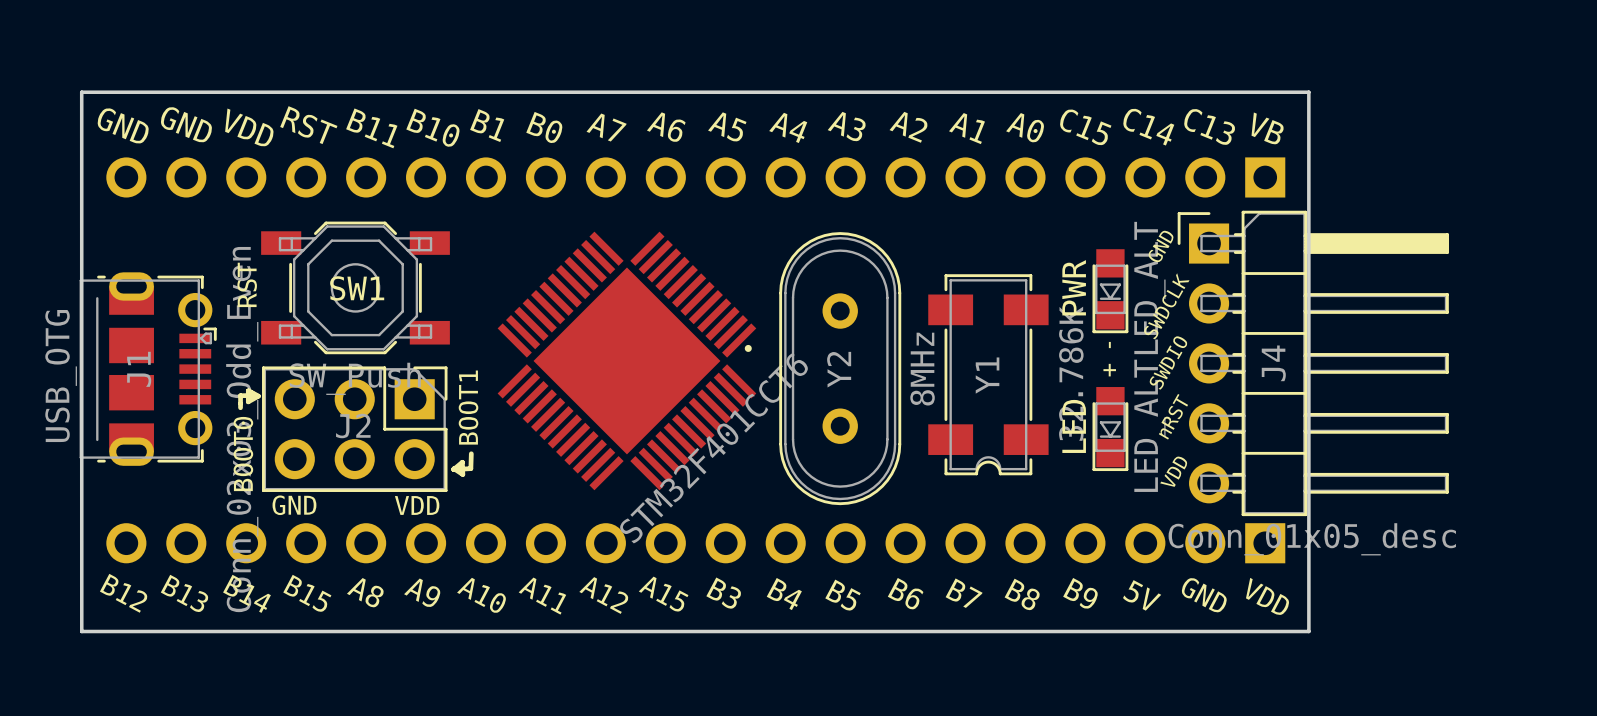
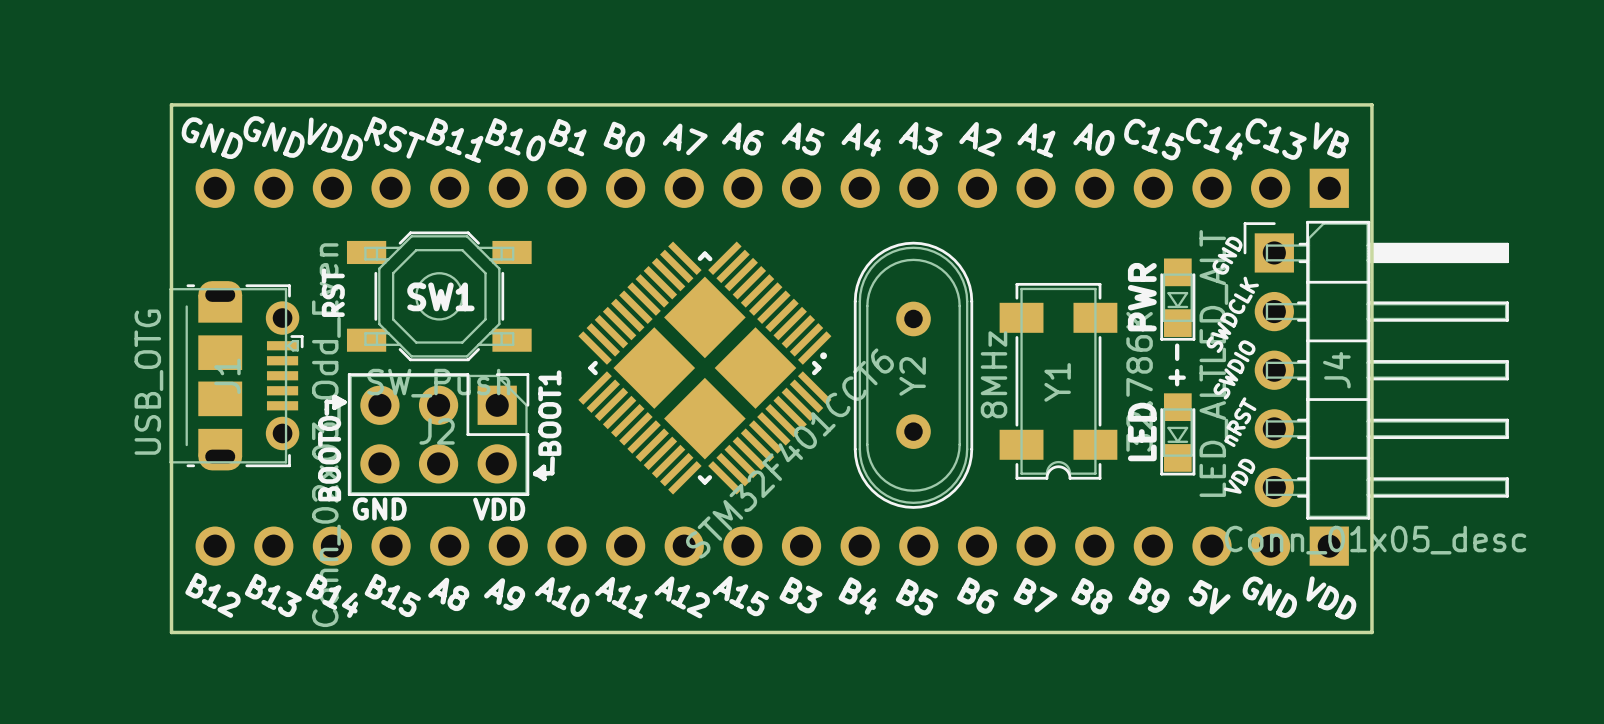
part footprint: [497, 231, 757, 491] -> [578, 241, 832, 495]

